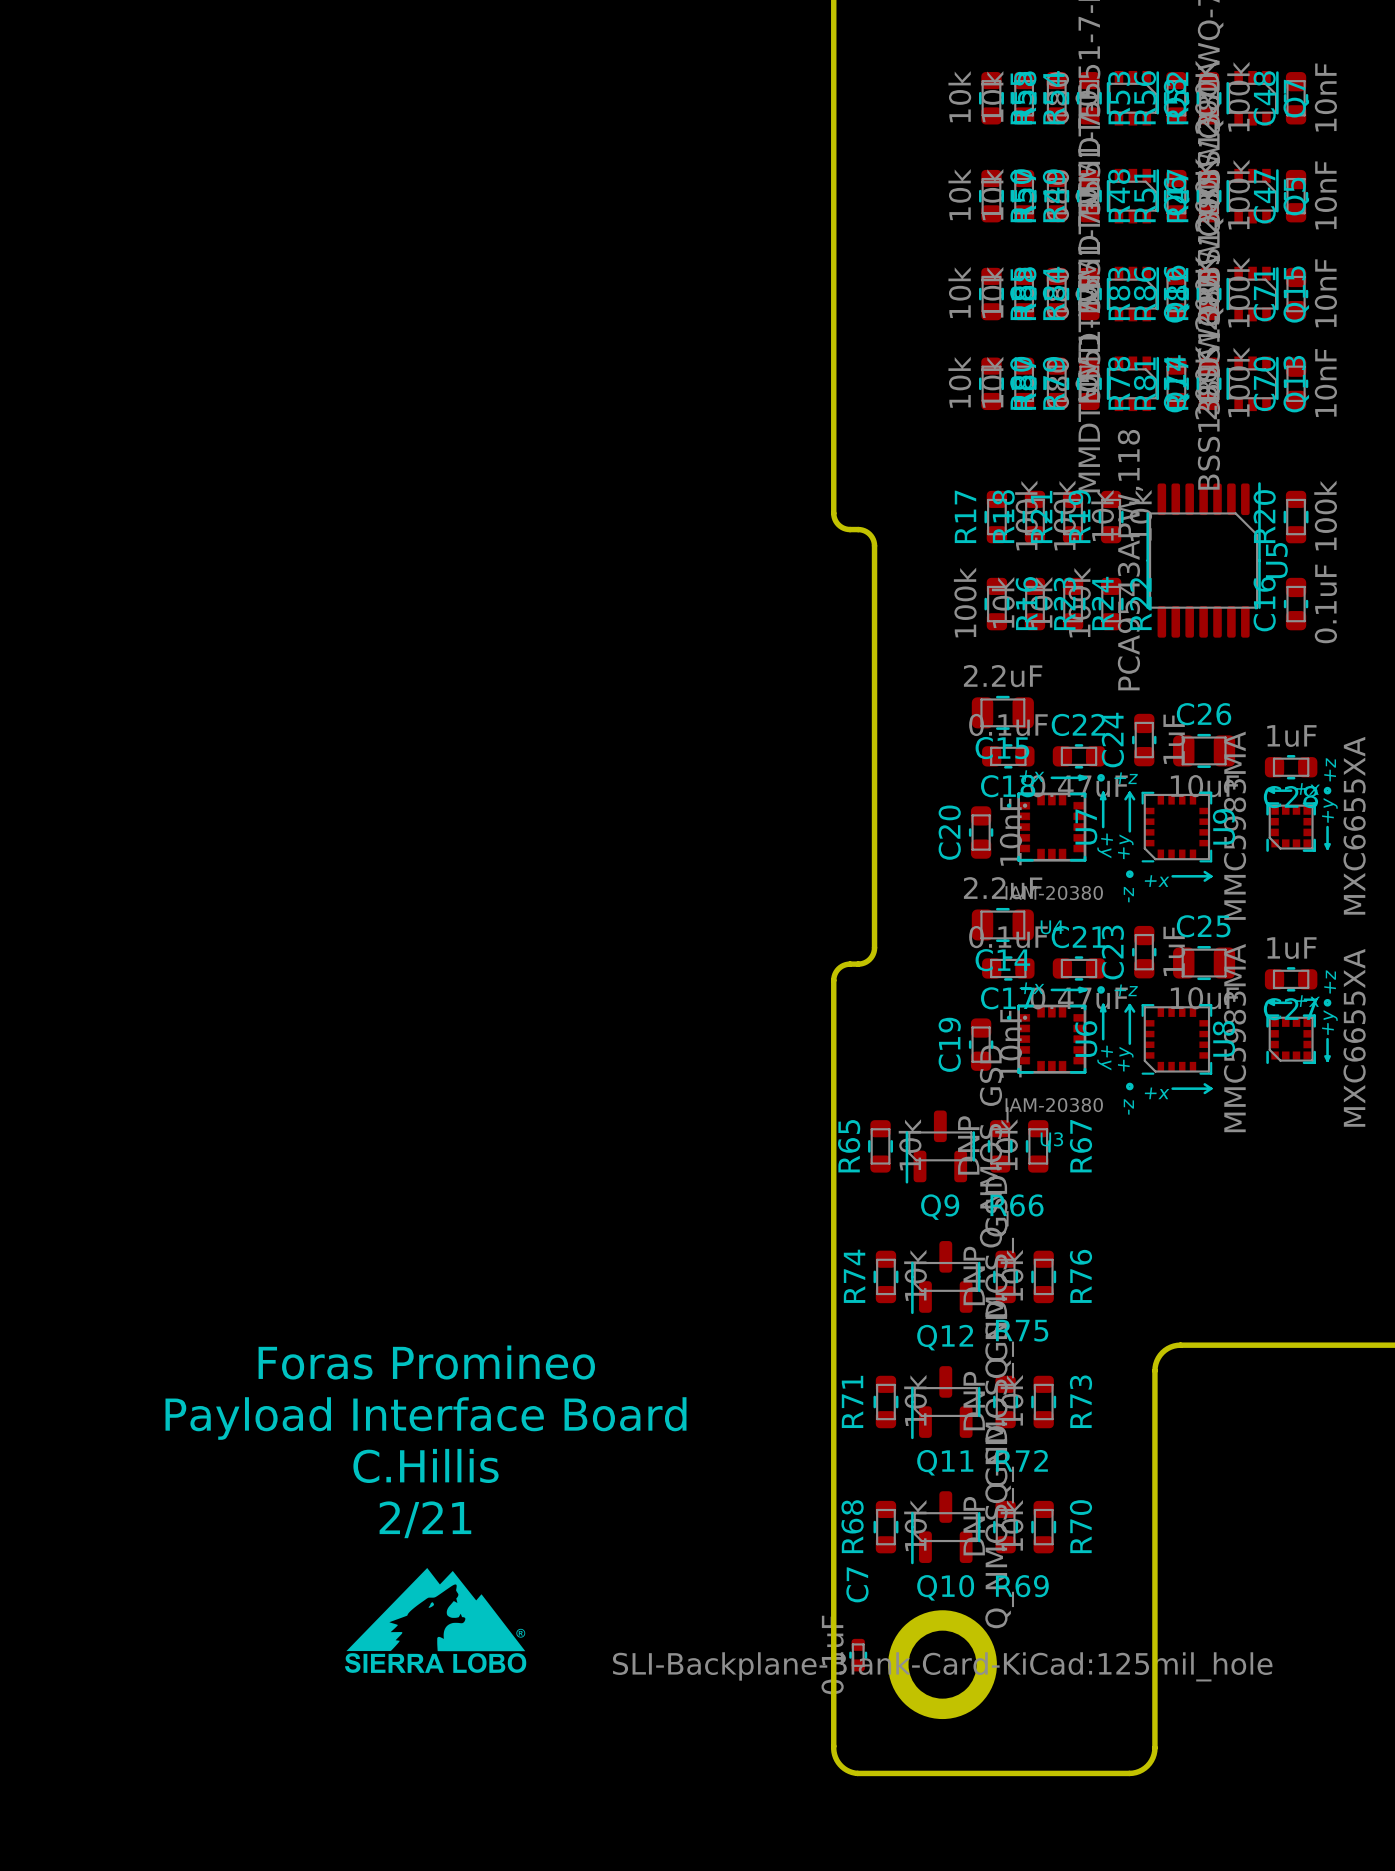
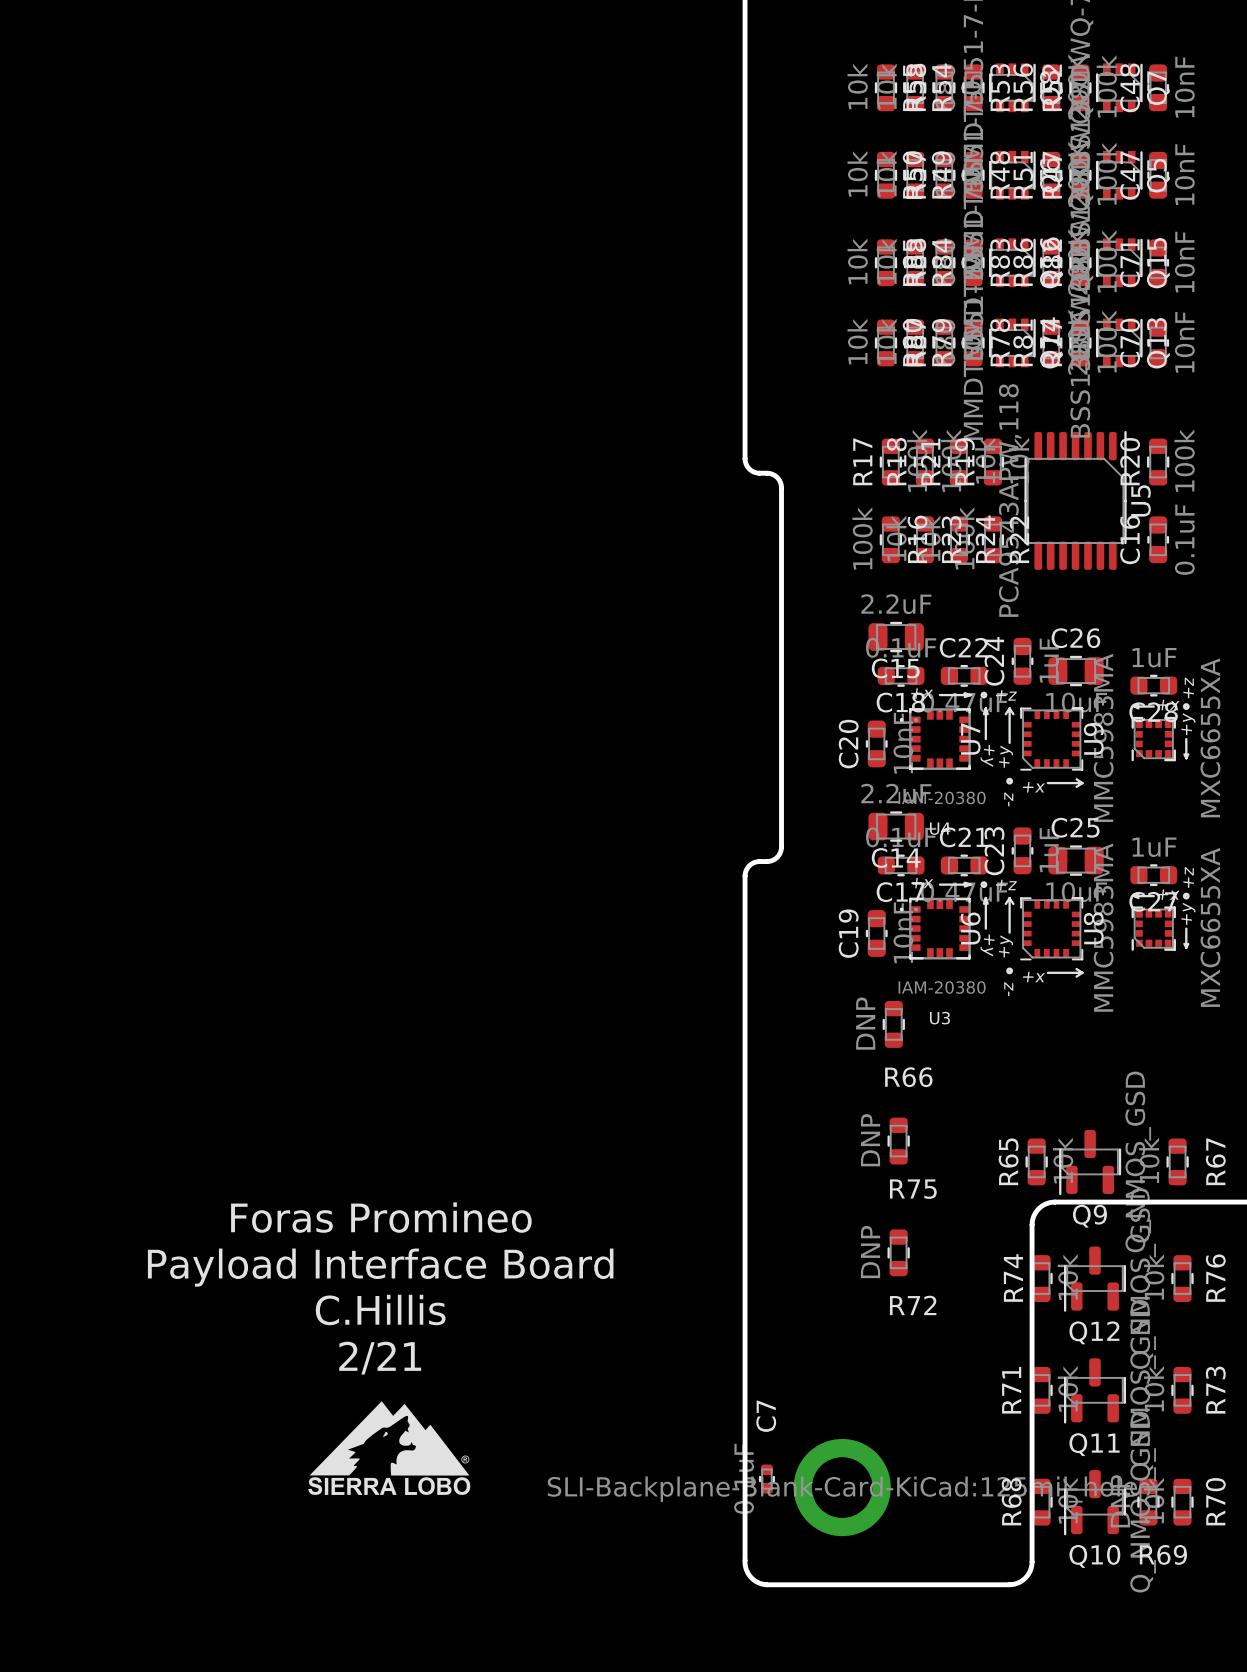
R65 position: (880, 1146) -> (1036, 1161)
R67 position: (1038, 1146) -> (1177, 1161)
Q9 position: (940, 1147) -> (1090, 1162)
R74 position: (885, 1276) -> (1041, 1278)
R76 position: (1043, 1276) -> (1182, 1278)
Q12 position: (945, 1277) -> (1094, 1279)
R71 position: (885, 1402) -> (1041, 1390)
Q11 position: (945, 1402) -> (1094, 1390)
R73 position: (1043, 1402) -> (1182, 1390)
R68 position: (885, 1527) -> (1041, 1502)
Q10 position: (945, 1527) -> (1094, 1502)
R69 position: (1005, 1527) -> (1148, 1502)
R70 position: (1043, 1527) -> (1182, 1502)

